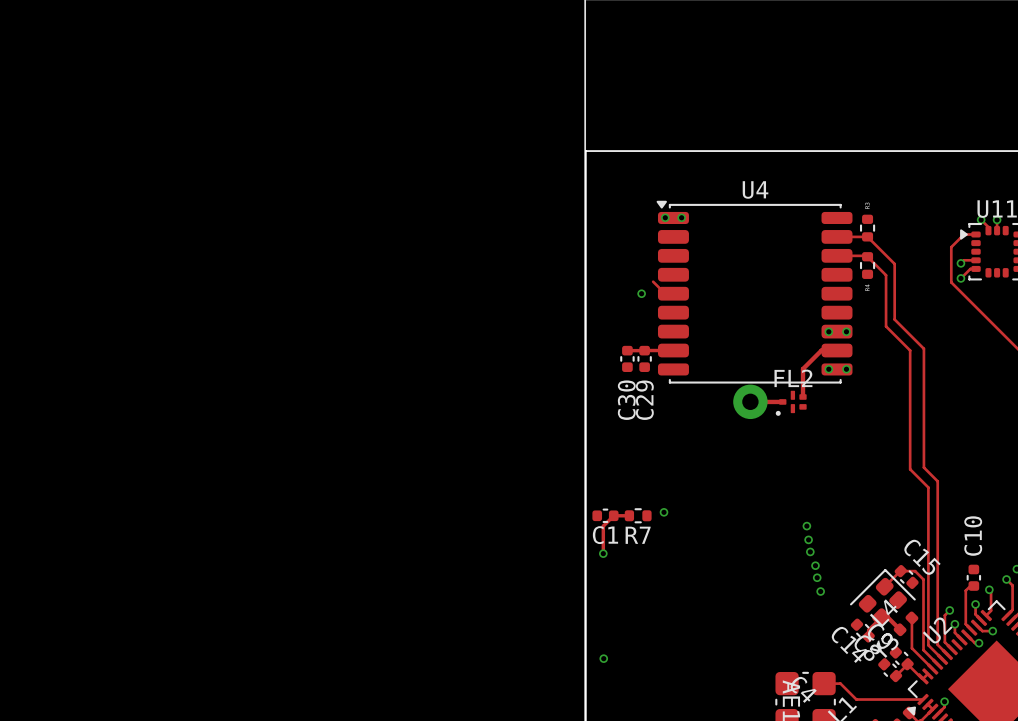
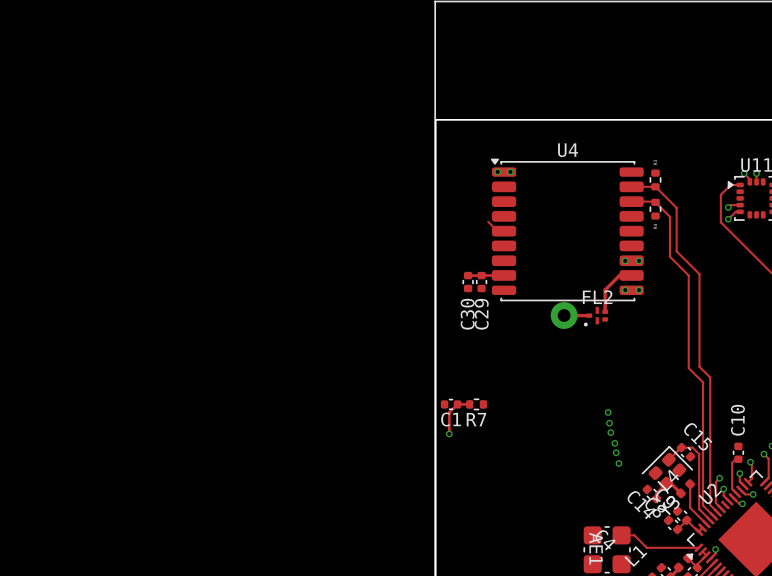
via: (641, 293) -> none
via: (664, 512) -> none
via: (603, 658) -> none

